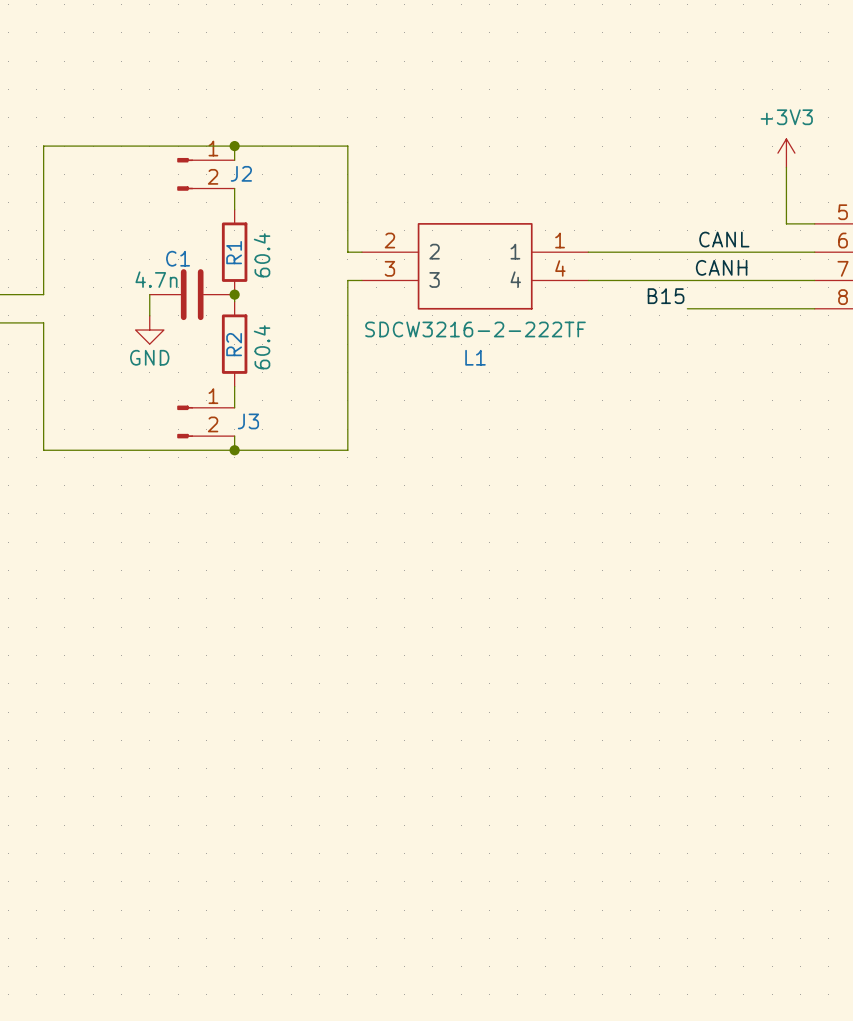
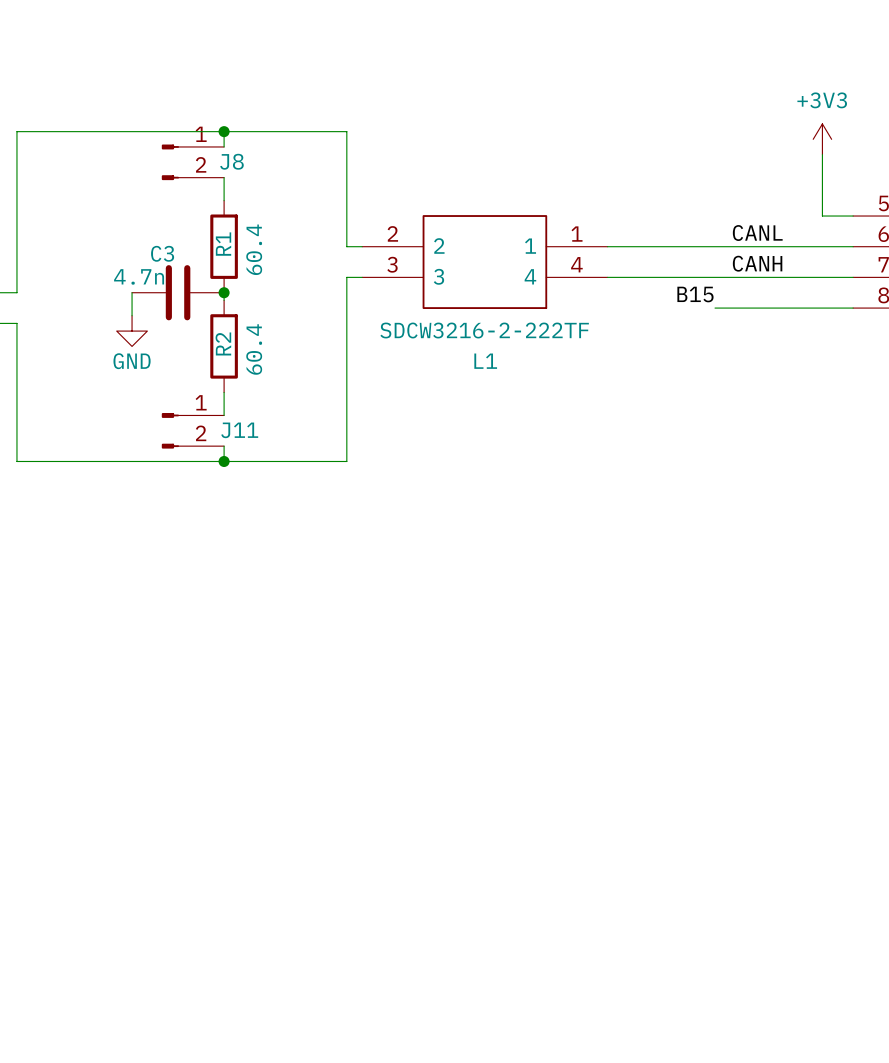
J2 name: J2 (241, 173) -> J8 (231, 161)
C1 name: C1 (178, 258) -> C3 (162, 253)
J3 name: J3 (248, 421) -> J11 (239, 430)

